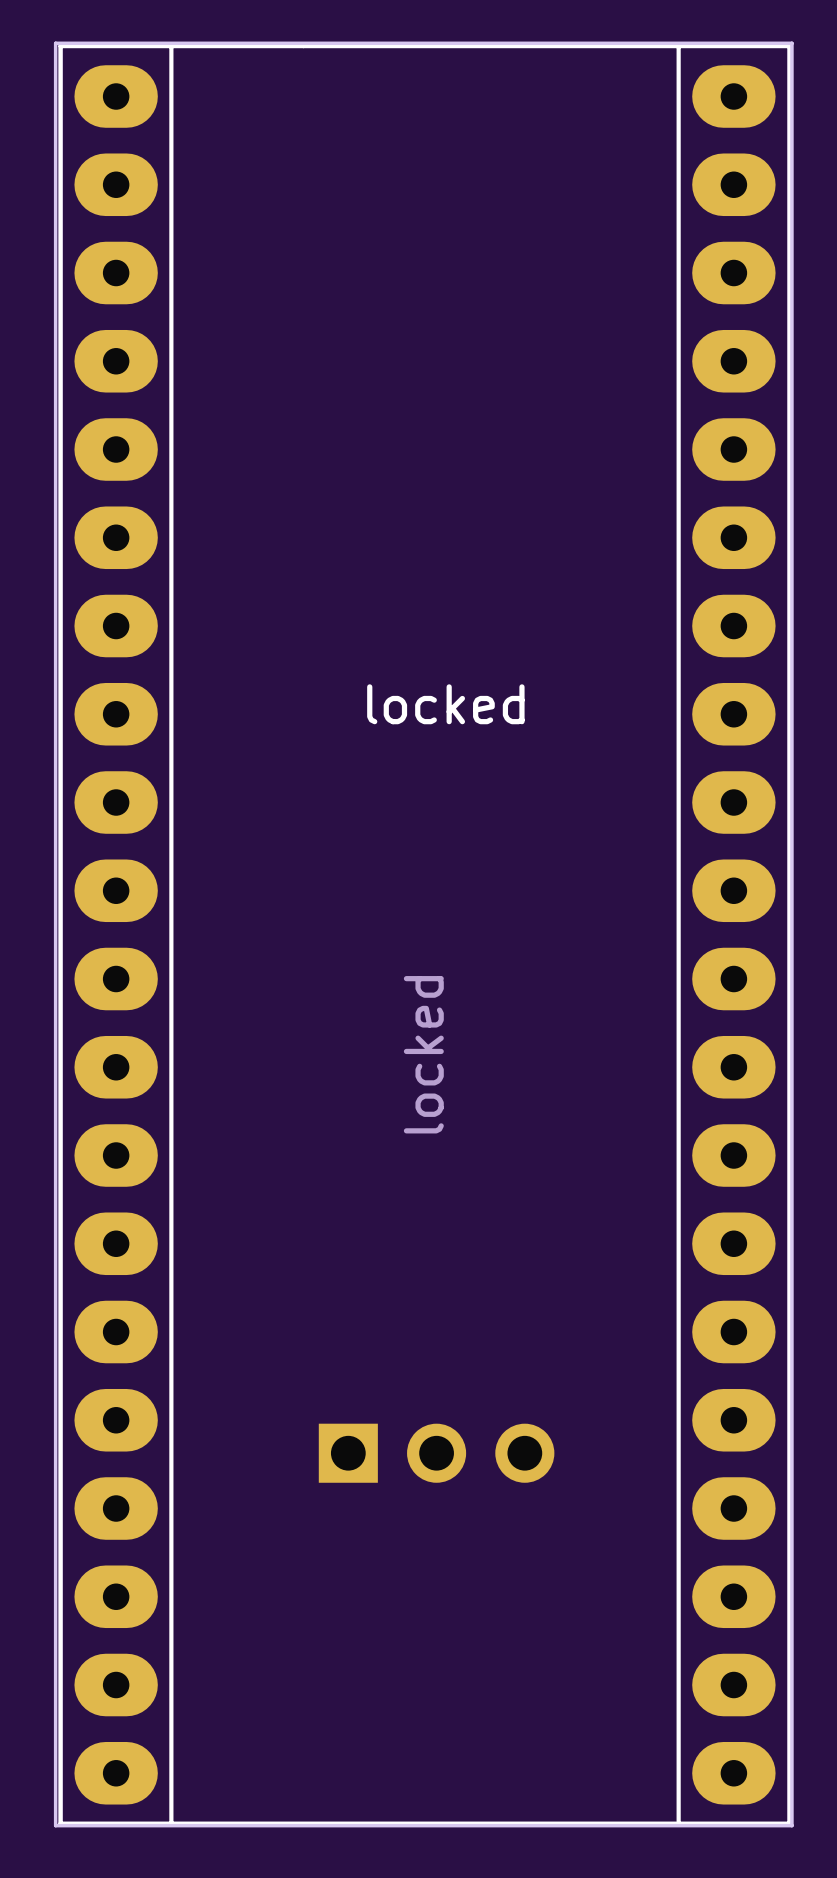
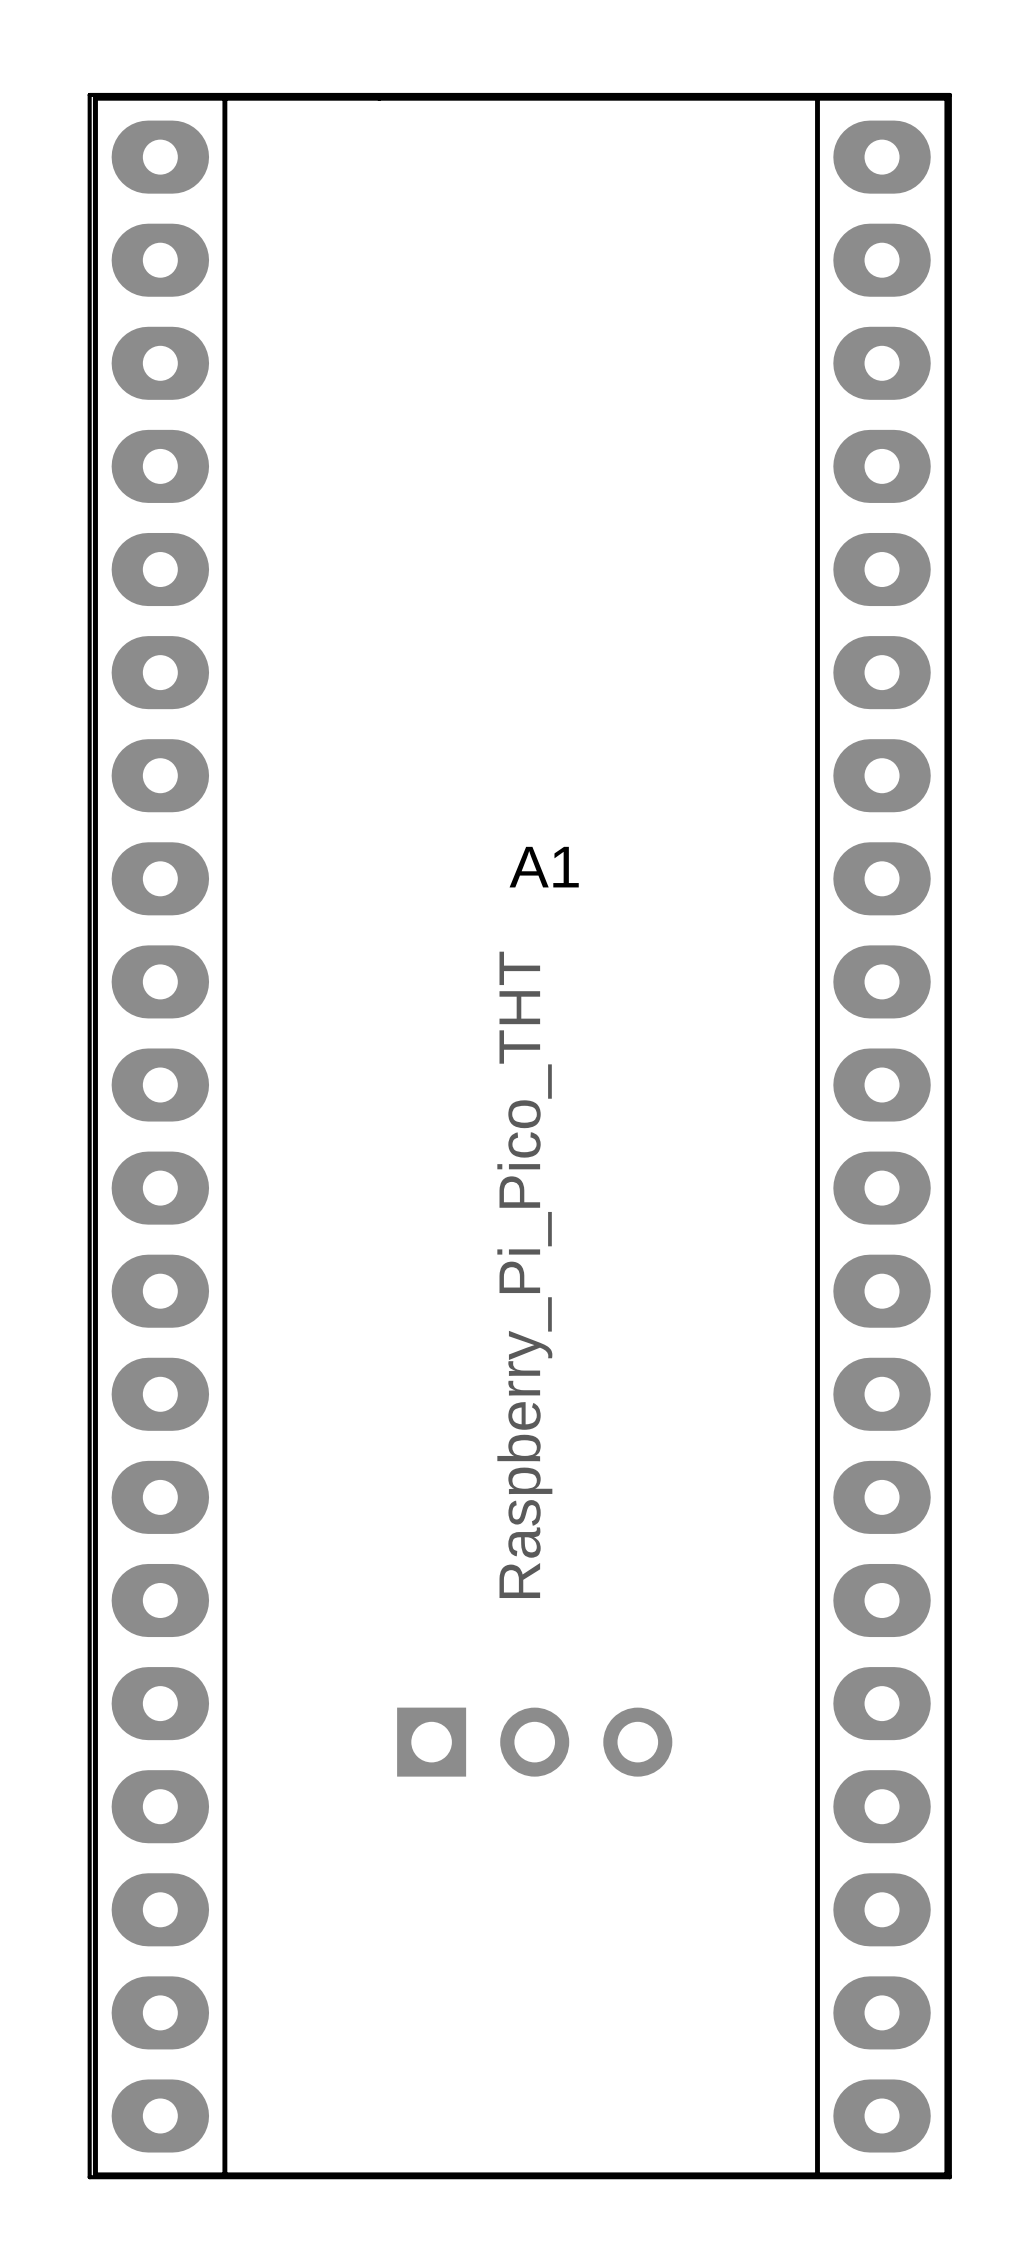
locked: locked (425, 934) -> none
A1: none -> Raspberry_Pi_Pico_THT (521, 1135)

